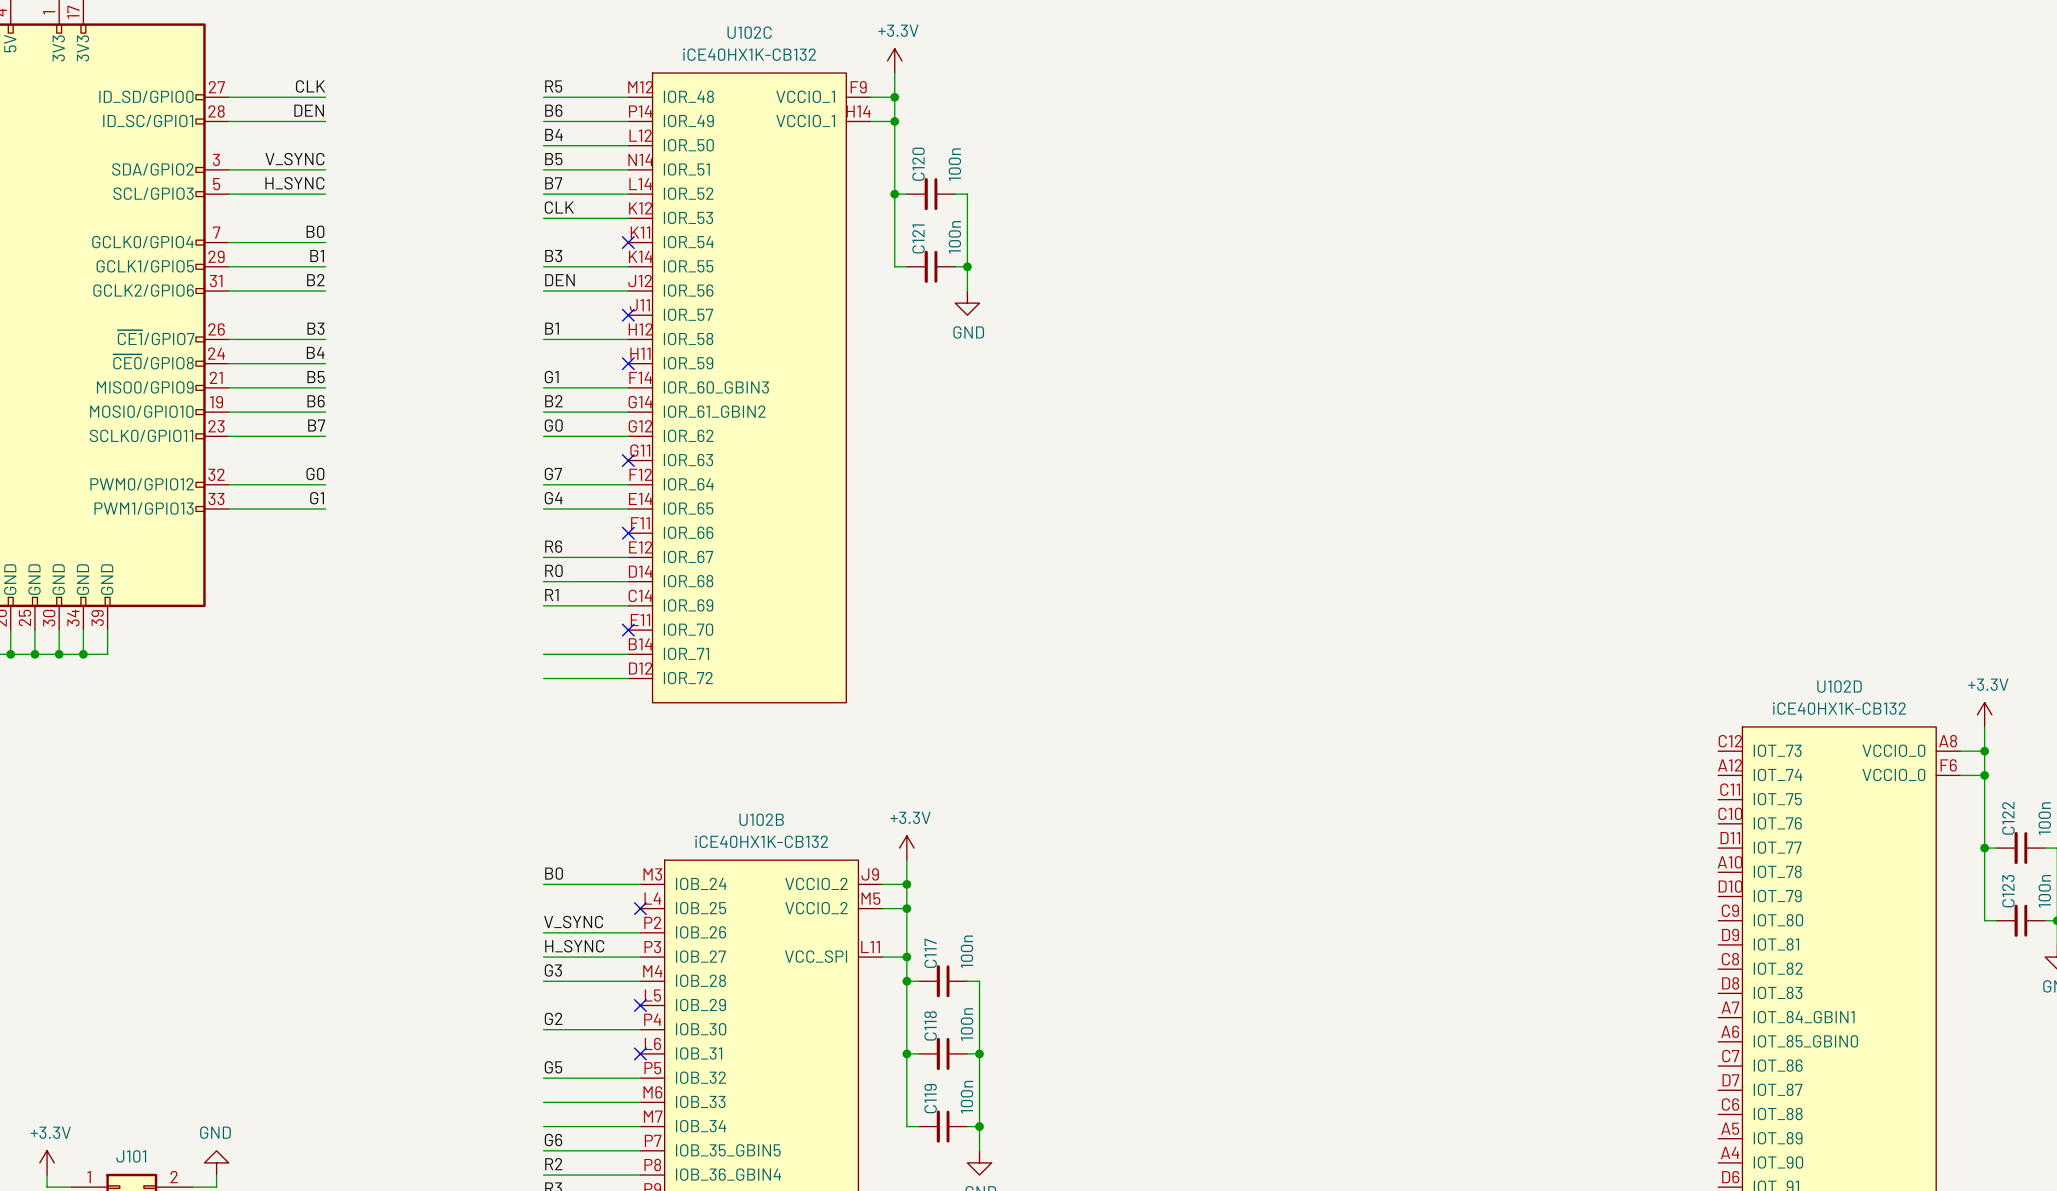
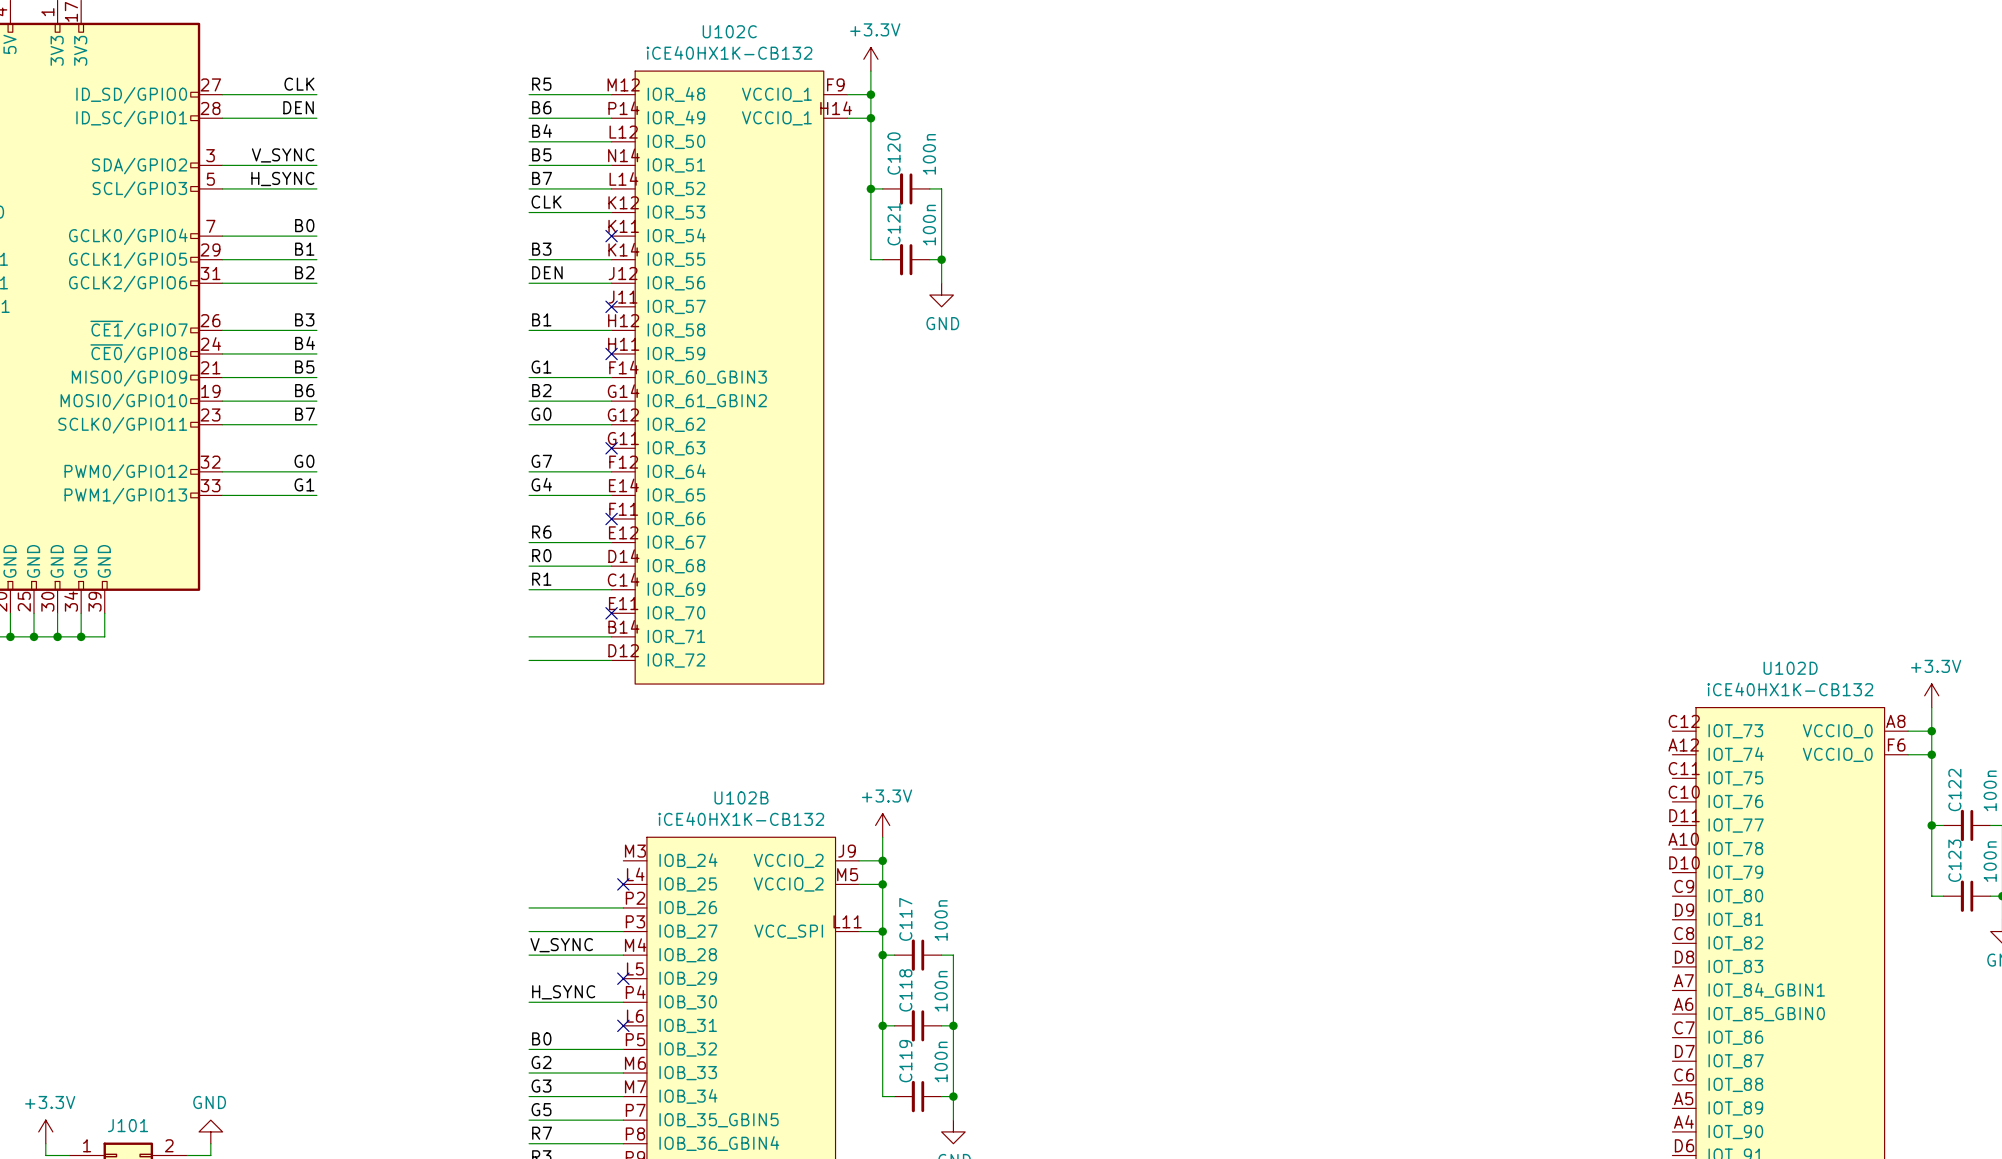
label: B0 (554, 873) -> none
wire: (543, 884) (640, 884) -> none
label: V_SYNC (573, 922) -> none
label: H_SYNC (574, 946) -> none
label: G3 (553, 970) -> V_SYNC (561, 945)
label: G2 (553, 1018) -> H_SYNC (563, 992)
label: G5 (553, 1067) -> B0 (541, 1038)
label: none -> G2 (541, 1062)
label: none -> G3 (541, 1086)
label: G6 (553, 1140) -> G5 (541, 1109)
label: R2 (553, 1164) -> R7 (542, 1133)

